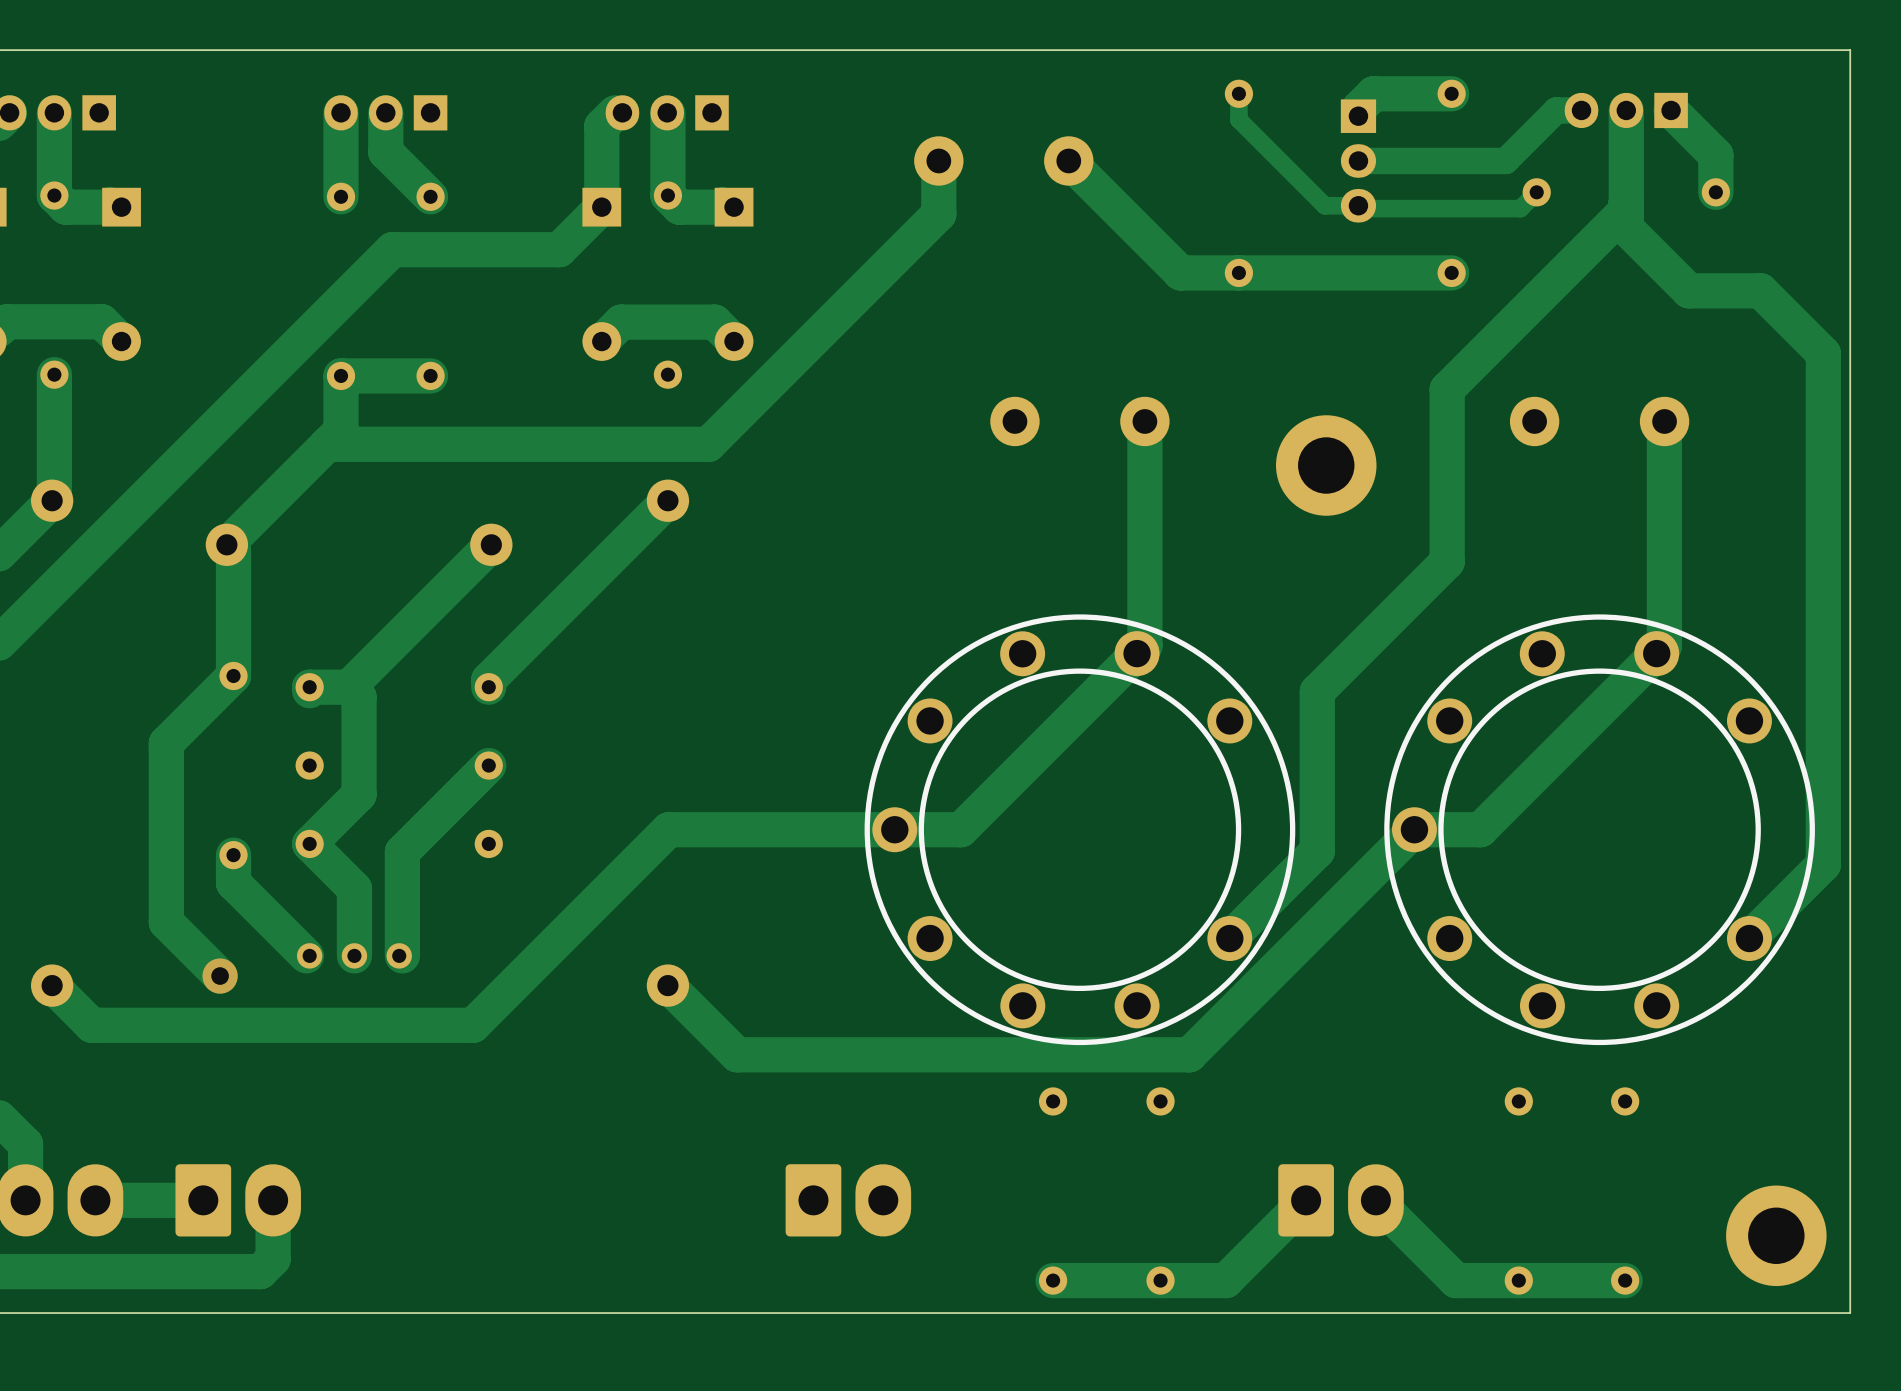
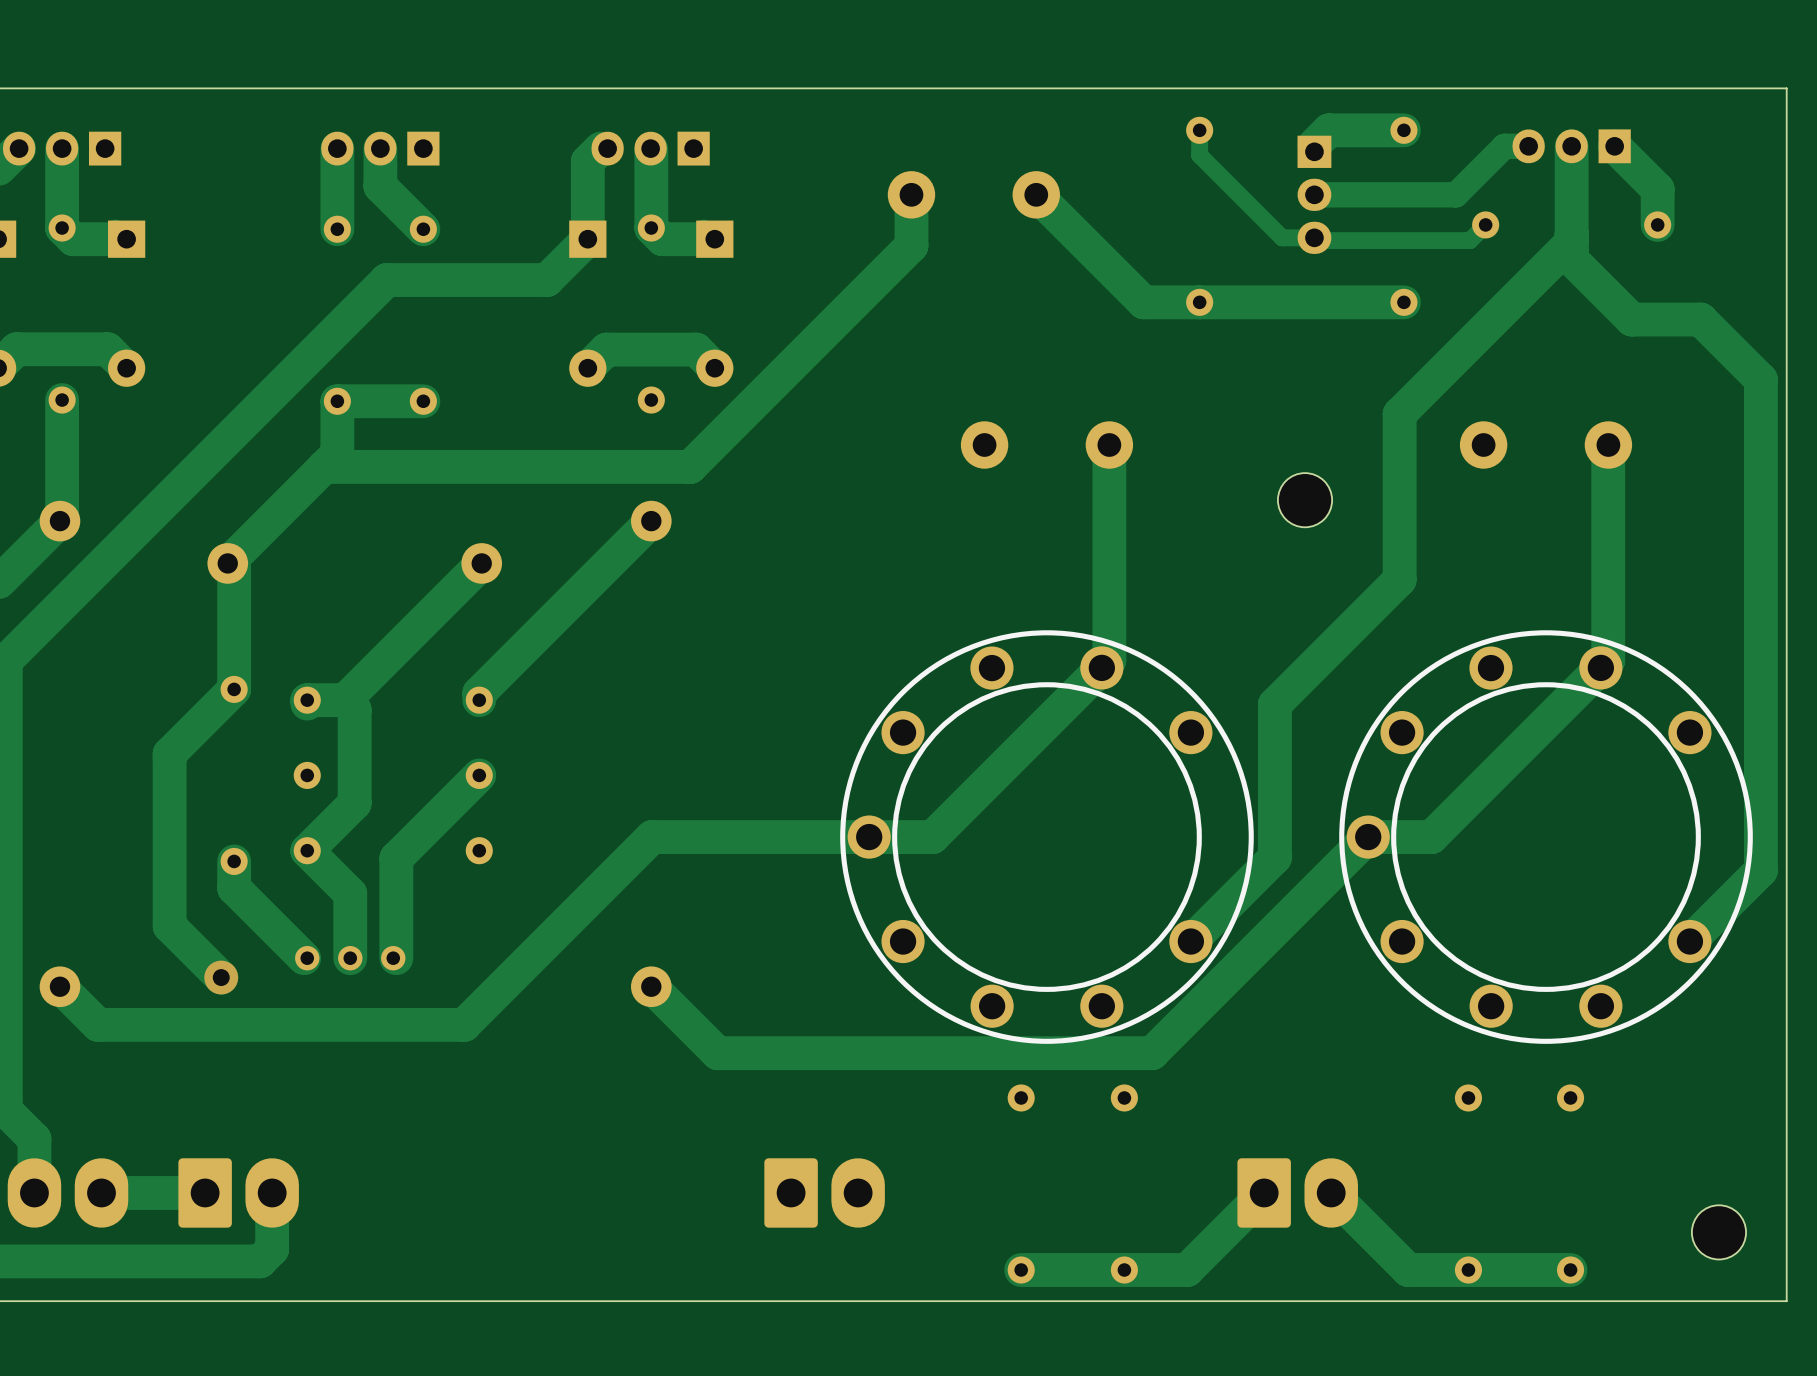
part: (1326, 465) -> none
part: none -> (1305, 500)
part footprint: [1726, 1185, 1827, 1287] -> [1691, 1205, 1747, 1260]

